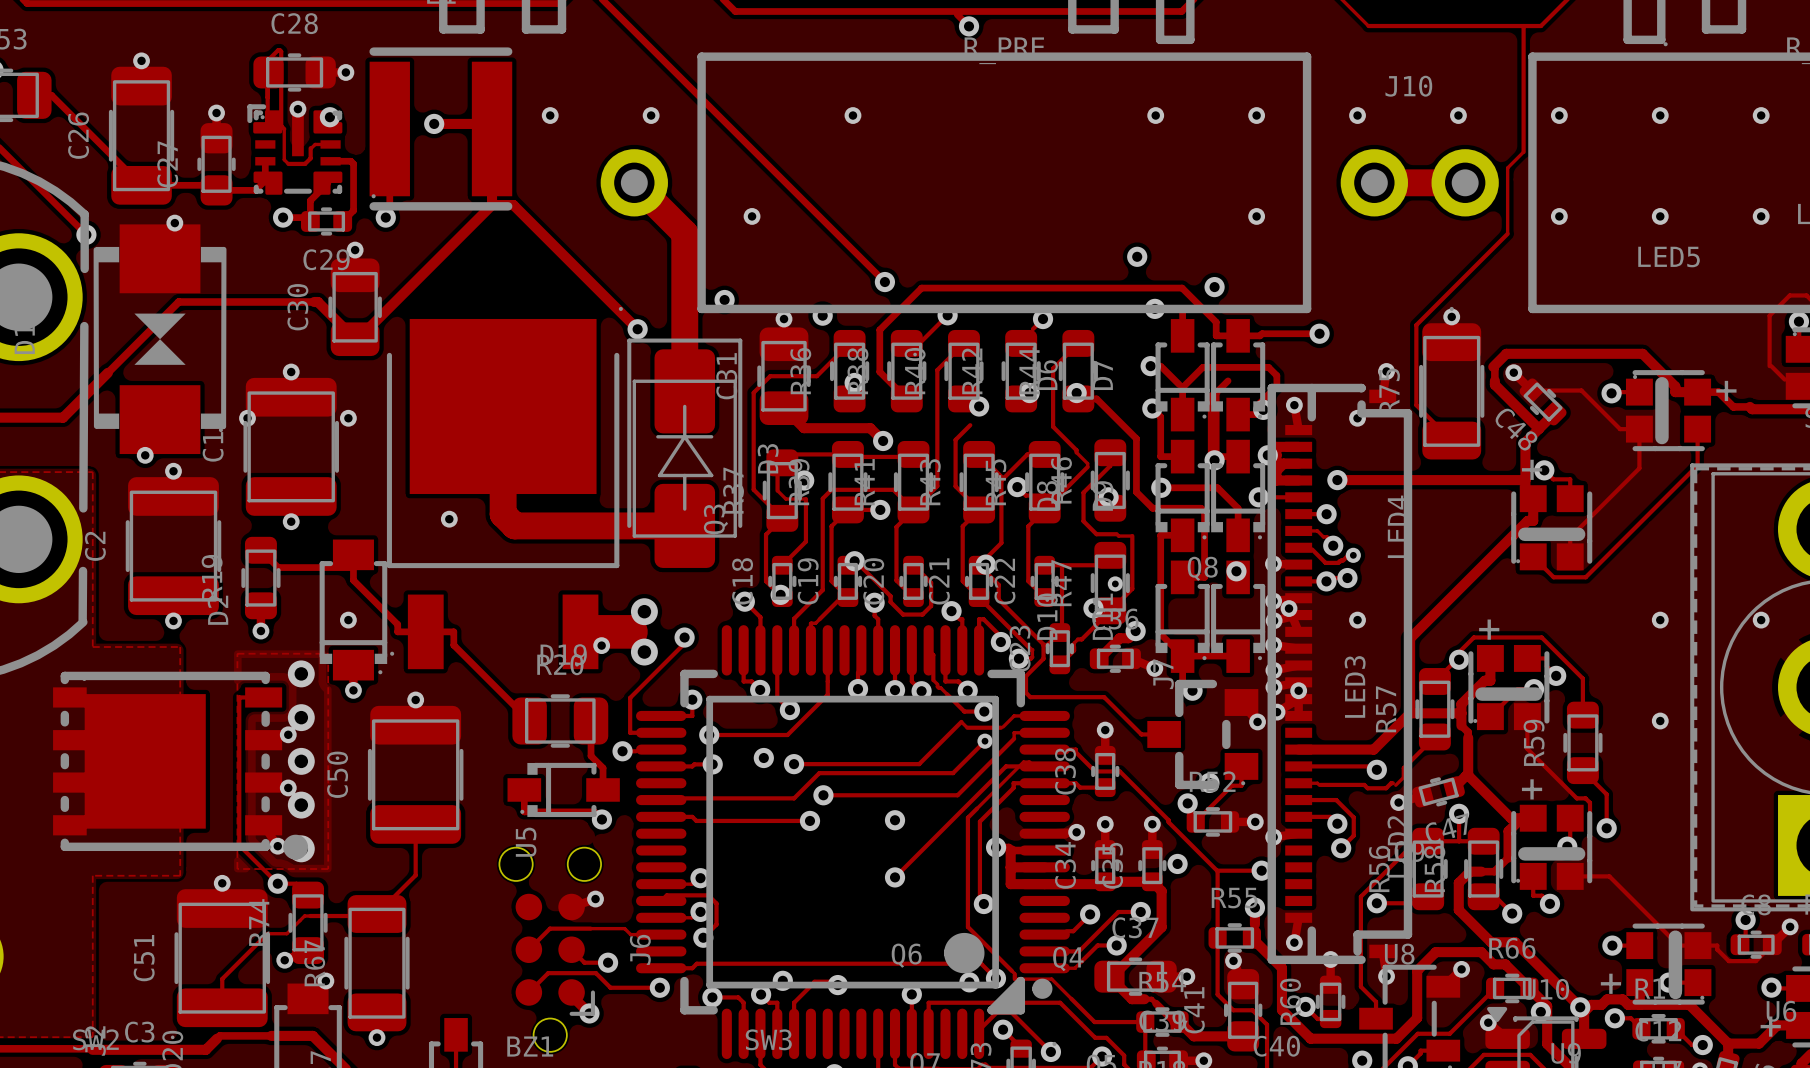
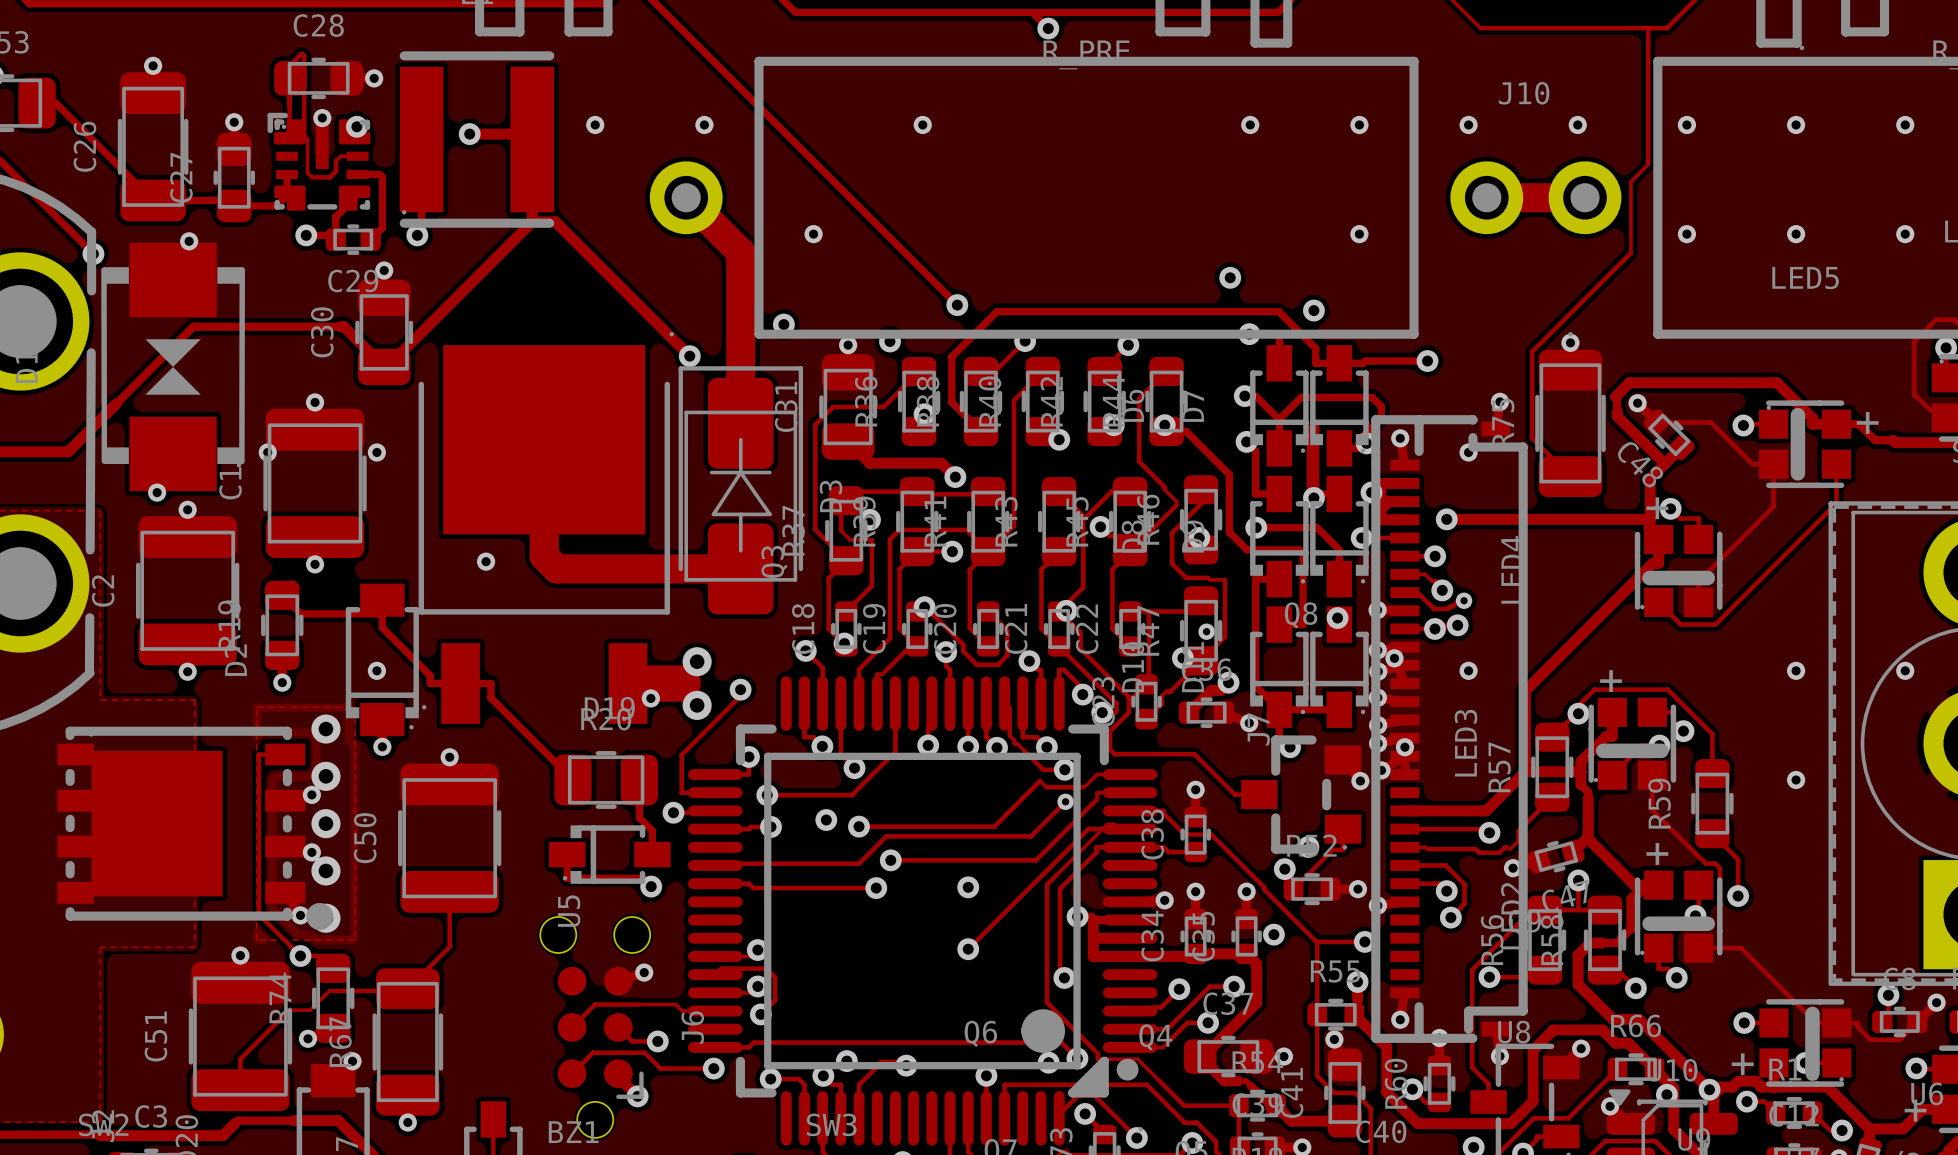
track: (1228, 380) (1216, 392) -> none
track: (970, 425) (955, 439) (955, 486) (979, 509) -> none

